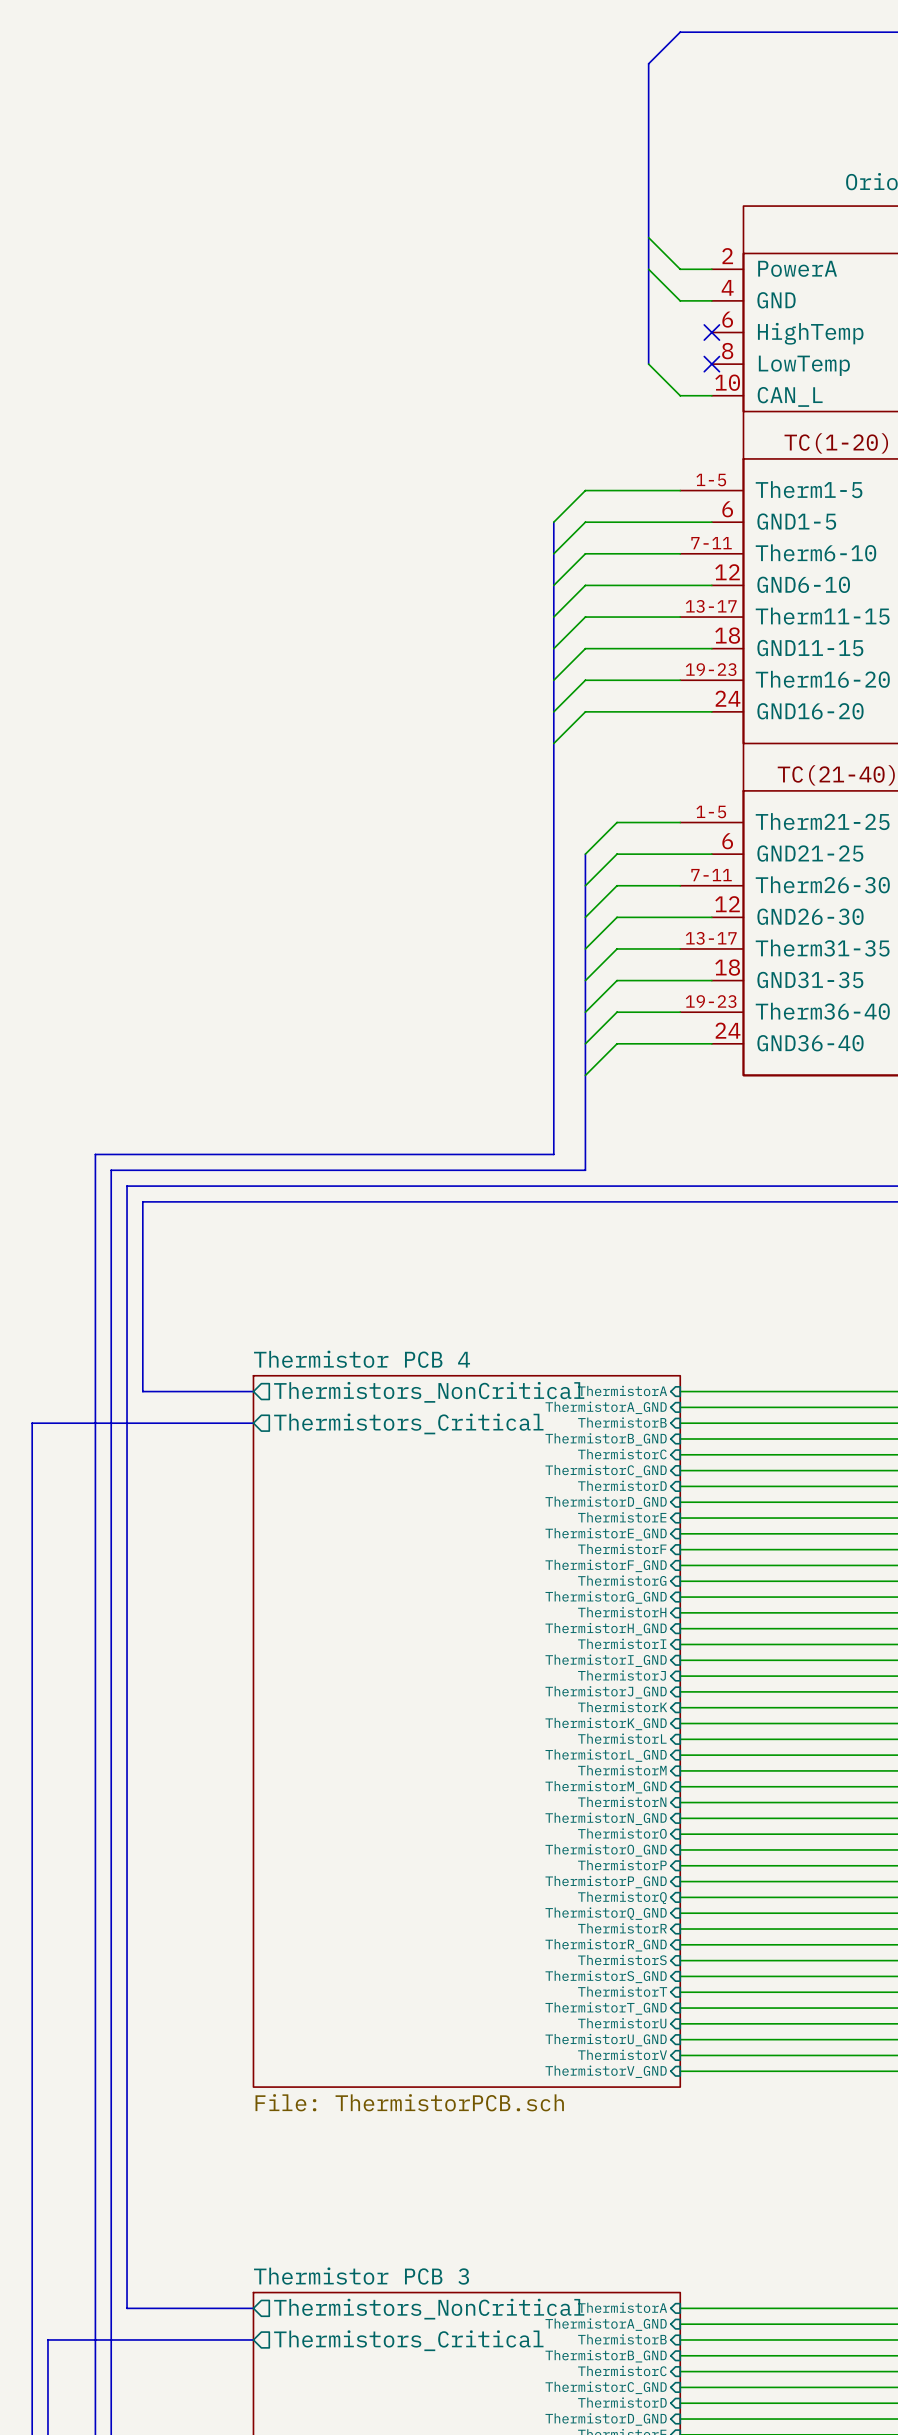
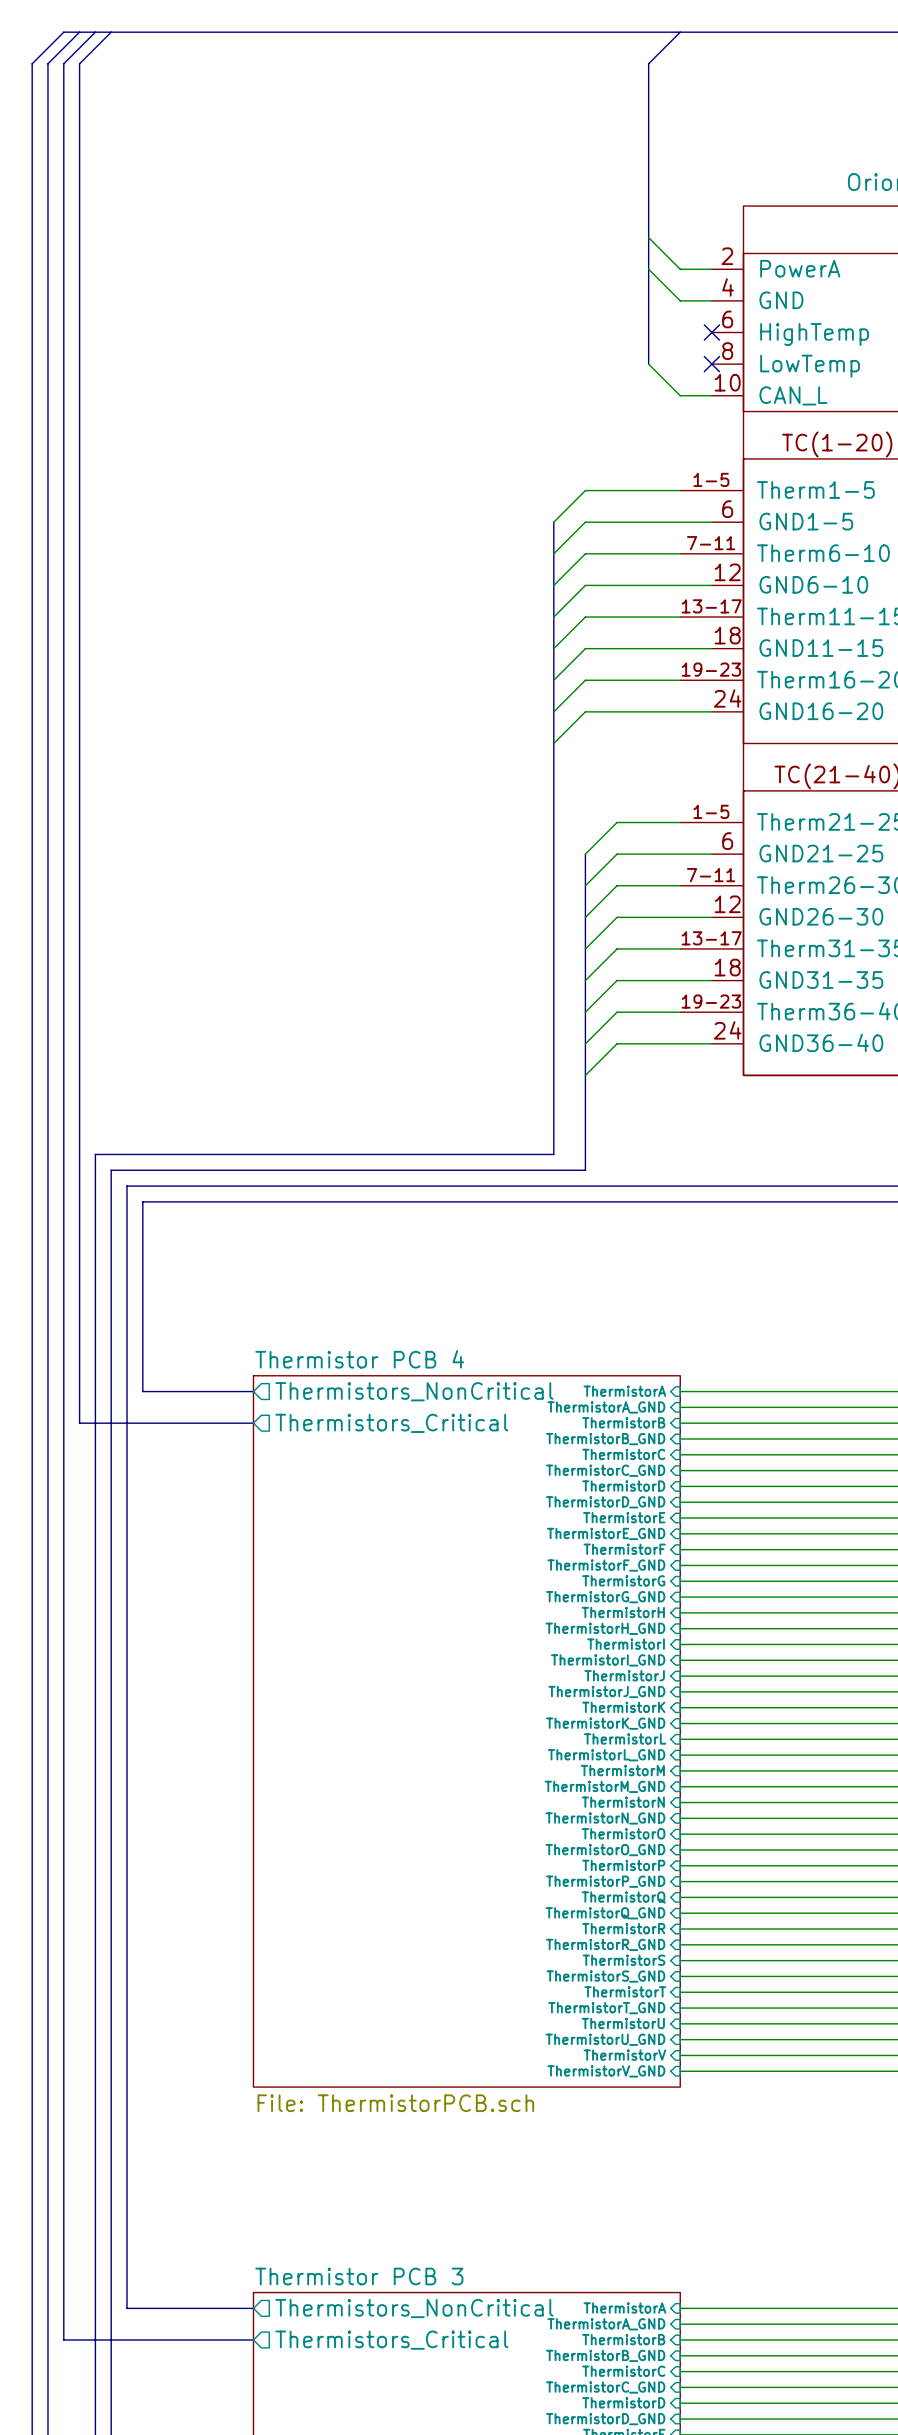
bus: none -> (95, 32) (63, 63) (63, 2339)
bus: none -> (680, 32) (63, 32) (32, 63) (32, 1423)
bus: (32, 1423) (79, 1423) -> (111, 32) (79, 63) (79, 1423)
bus: (47, 2339) (63, 2339) -> (47, 2339) (47, 63) (79, 32)

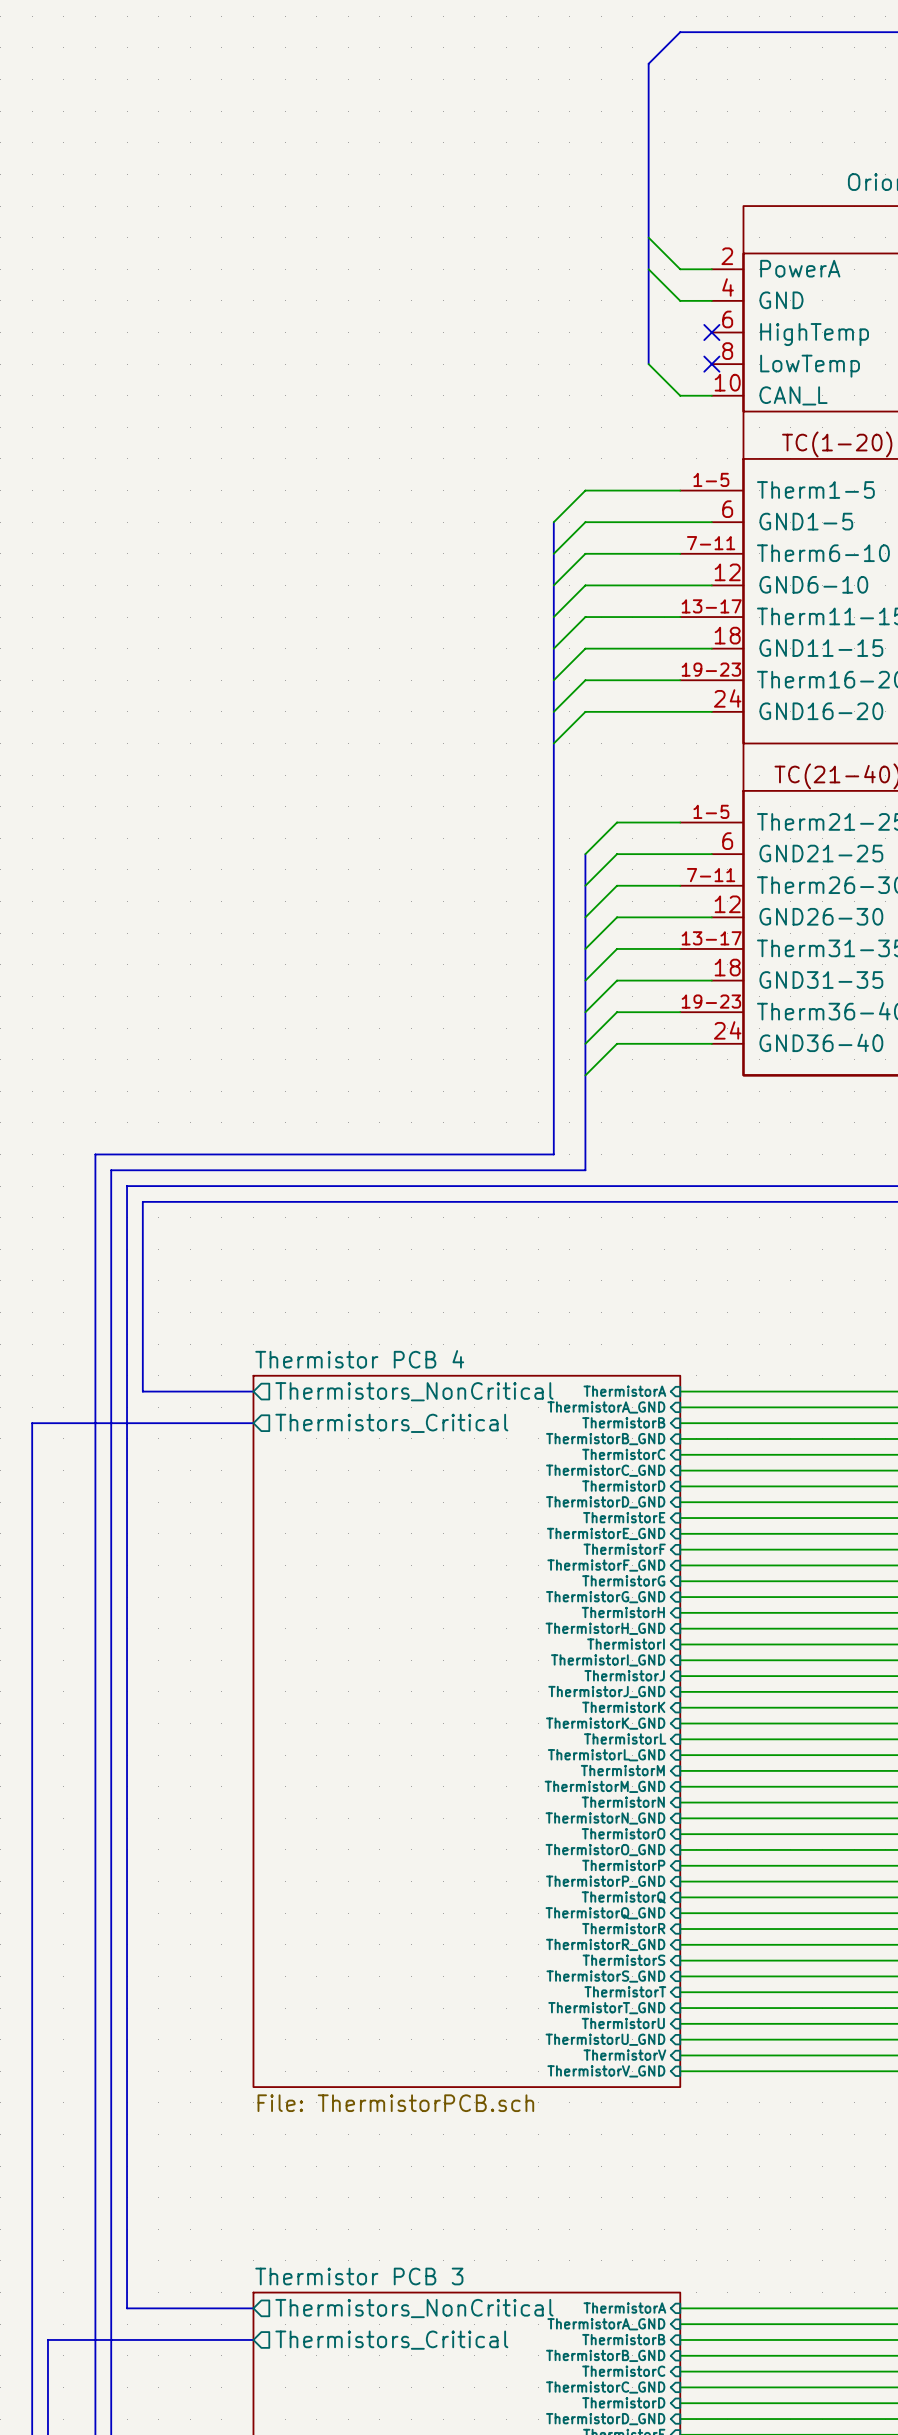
bus: (79, 32) (47, 63) (47, 2339) -> (63, 2339) (47, 2339)
bus: (95, 32) (63, 63) (63, 2339) -> none
bus: (111, 32) (79, 63) (79, 1423) -> (32, 1423) (79, 1423)
bus: (680, 32) (63, 32) (32, 63) (32, 1423) -> none

